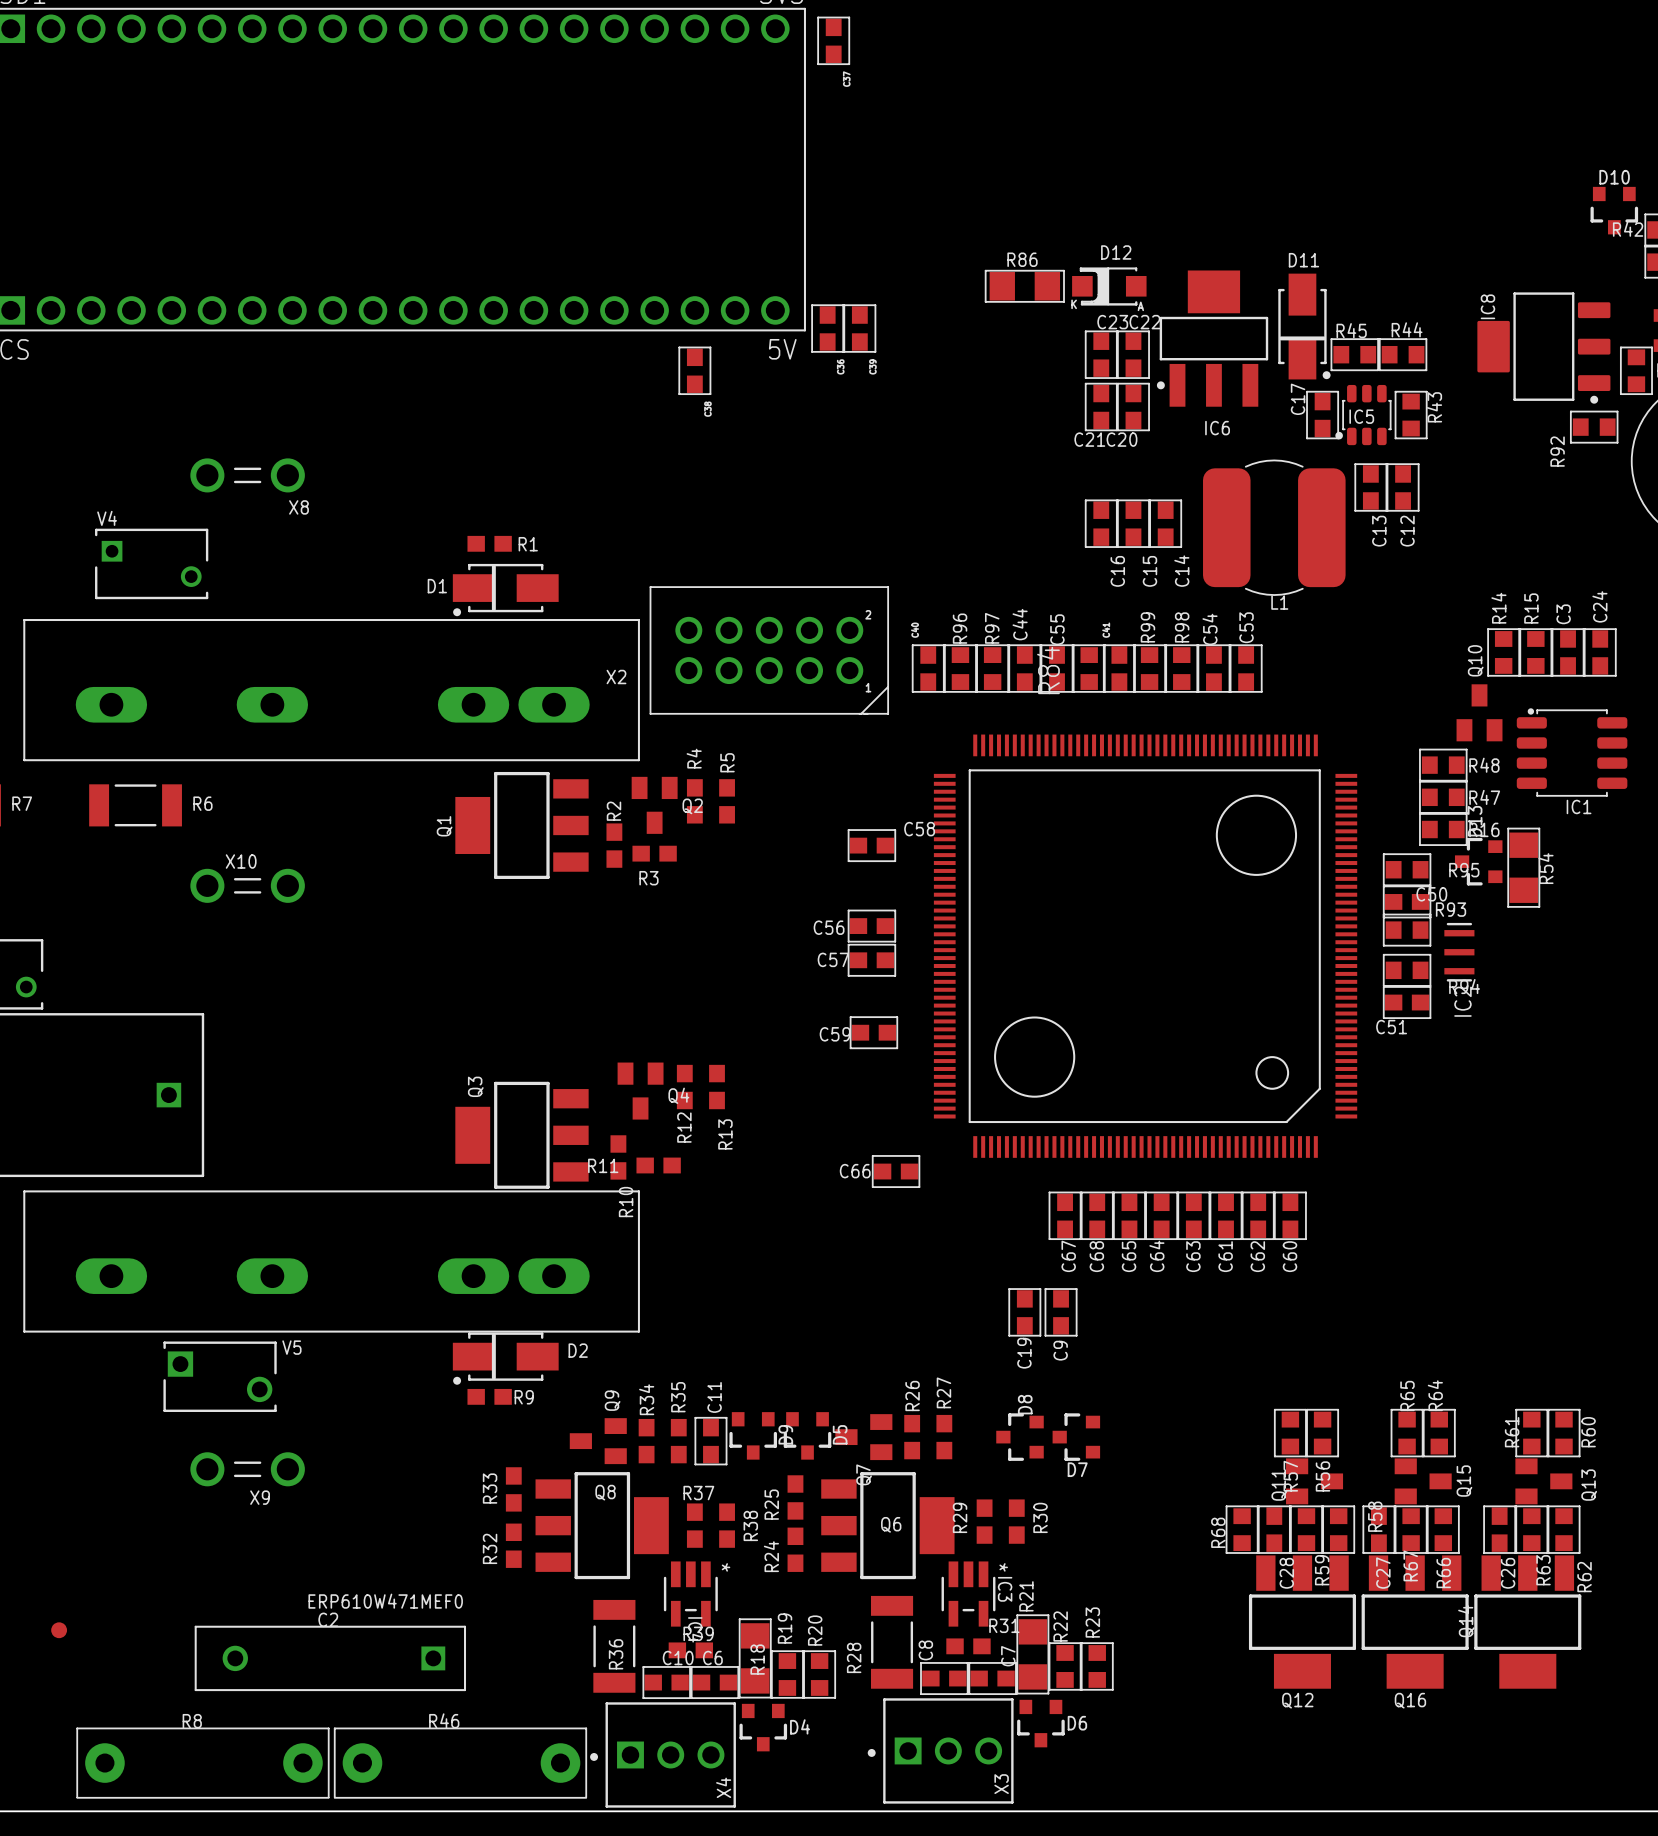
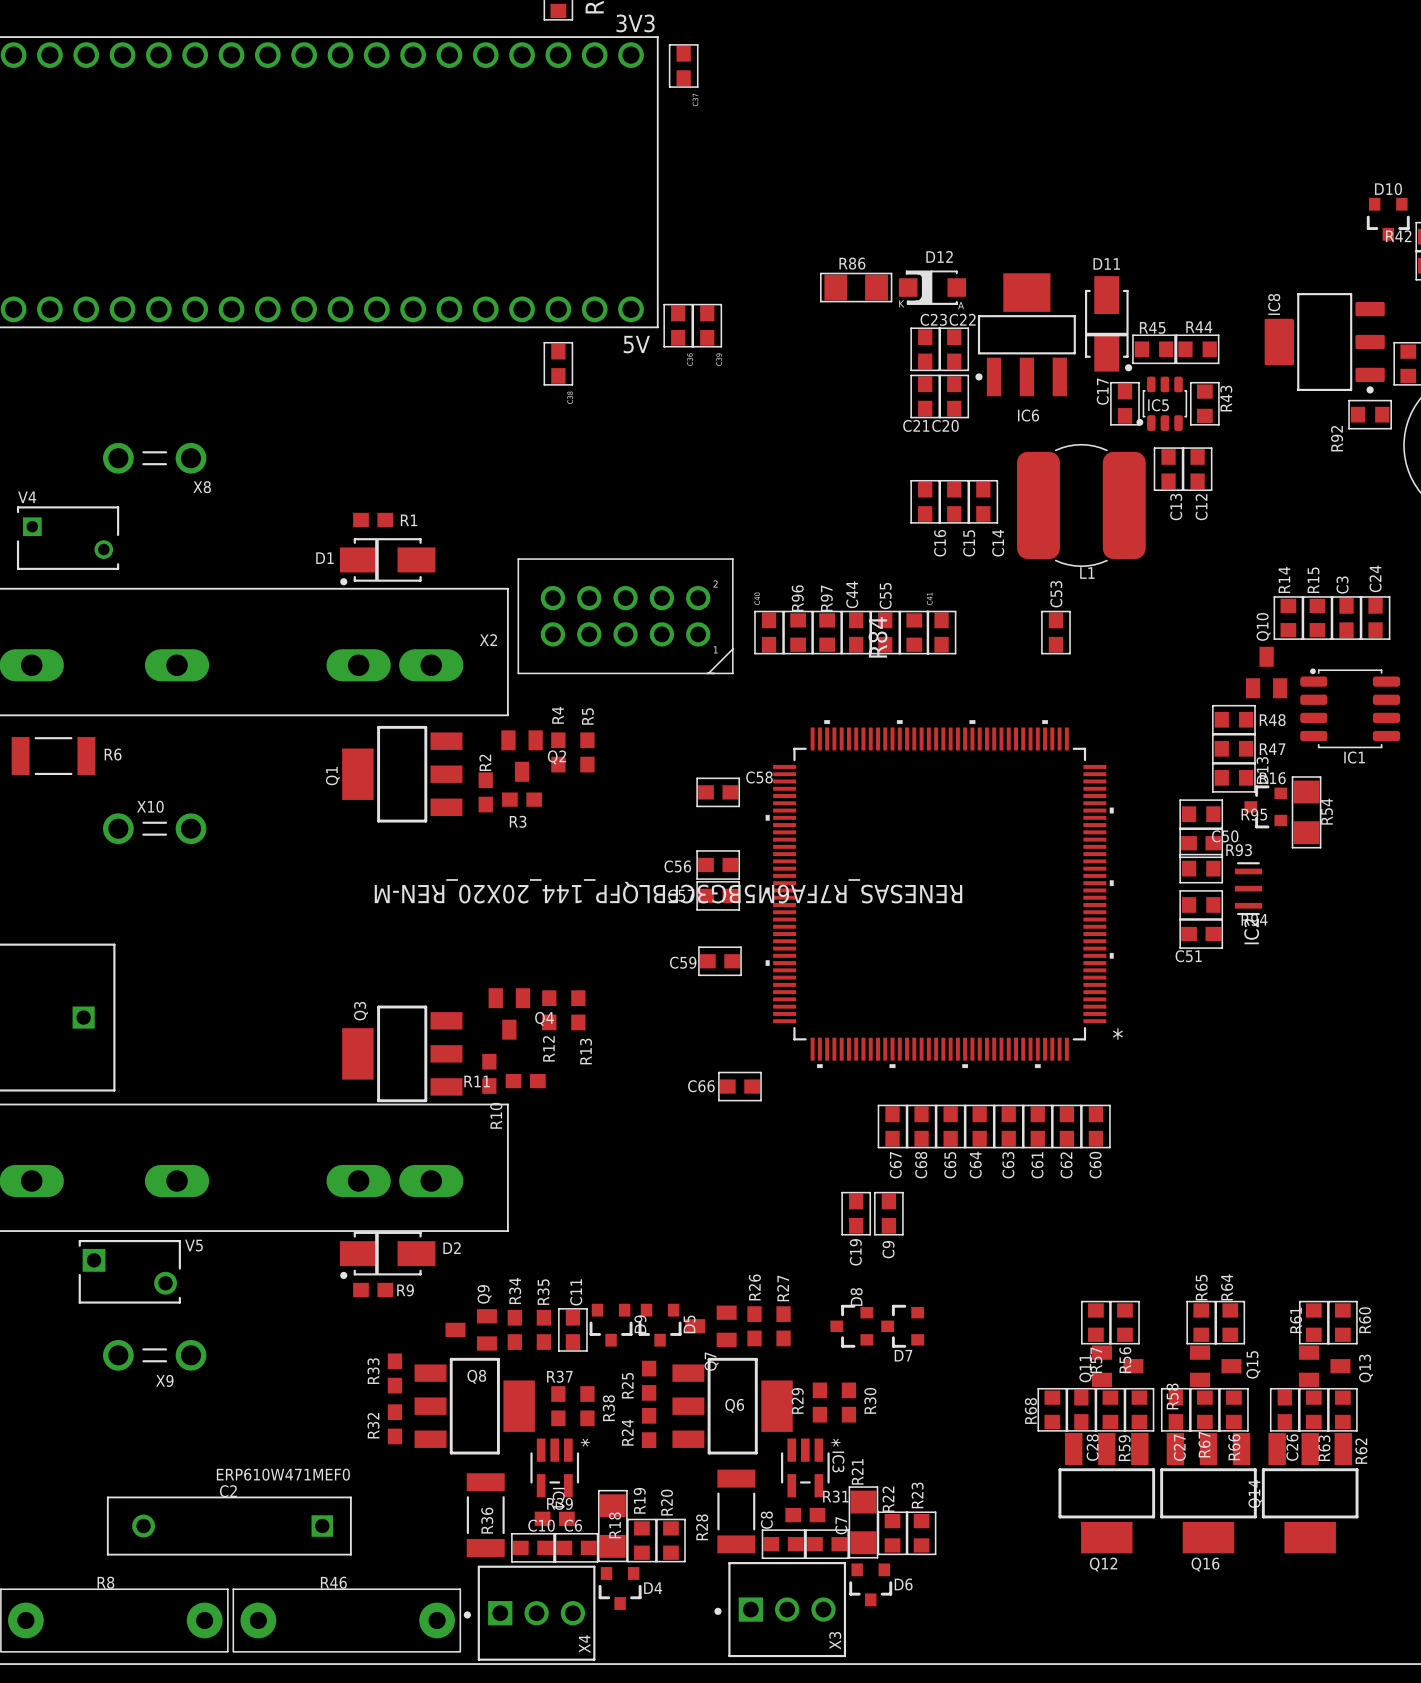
R99: (1149, 668) -> none
R98: (1181, 668) -> none
C54: (1213, 668) -> none
part: (1145, 946) -> none
part: none -> RENESAS_R7FA6M5BG3CFBLQFP_144_20X20_REN-M (939, 894)

